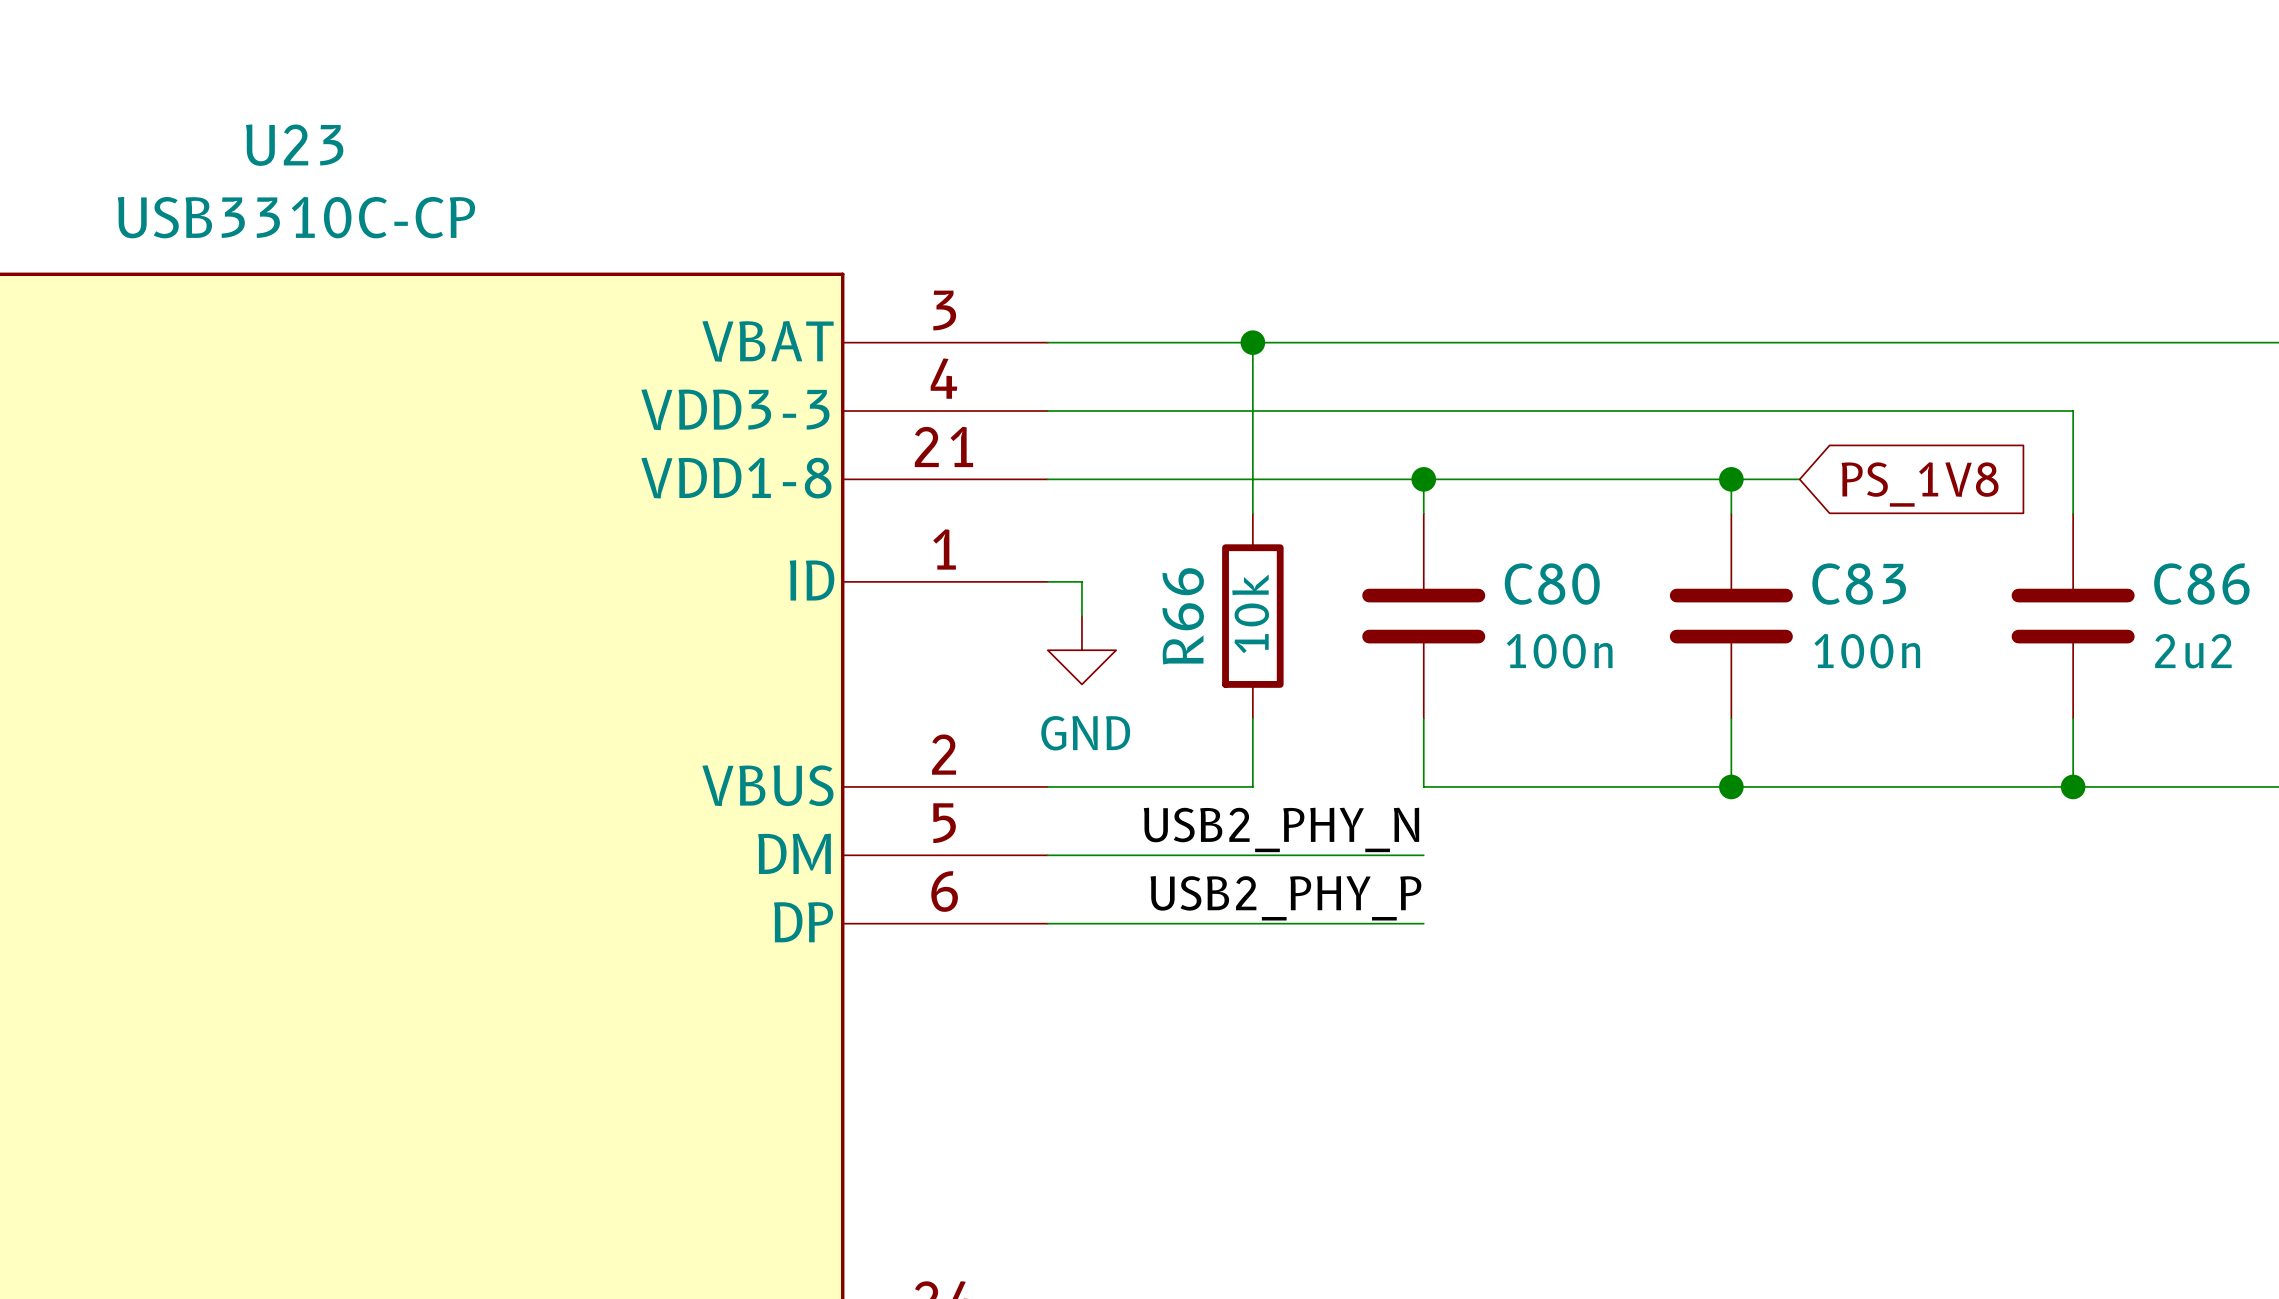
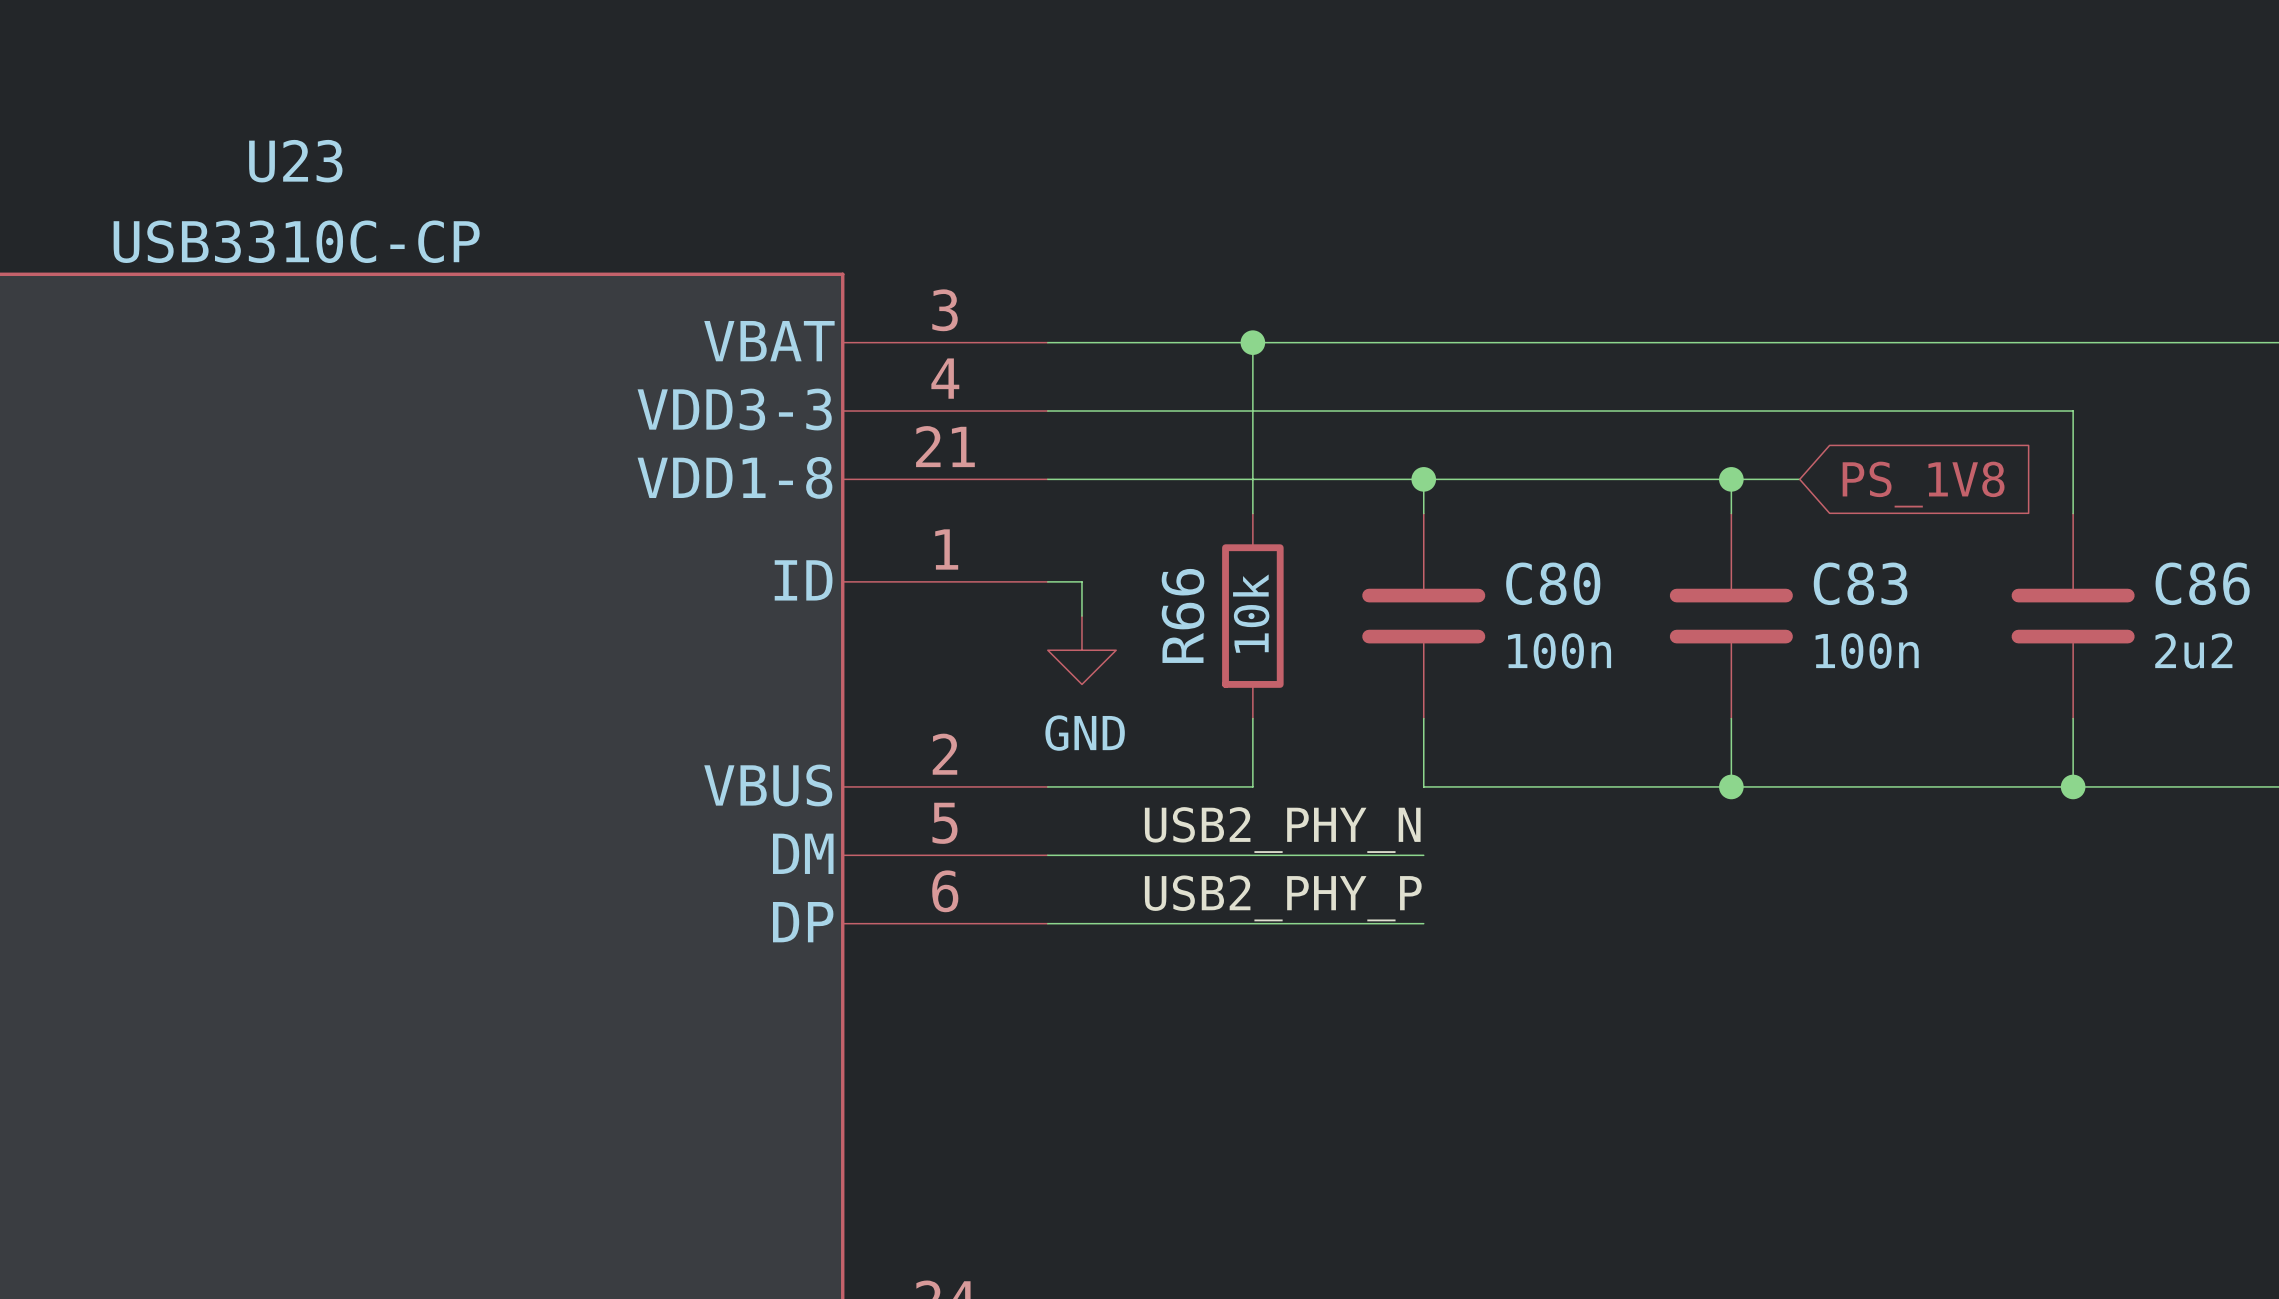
U23 name position: U23 (294, 145) -> U23 (295, 161)
U23 value position: USB3310C-CP (296, 217) -> USB3310C-CP (296, 241)

